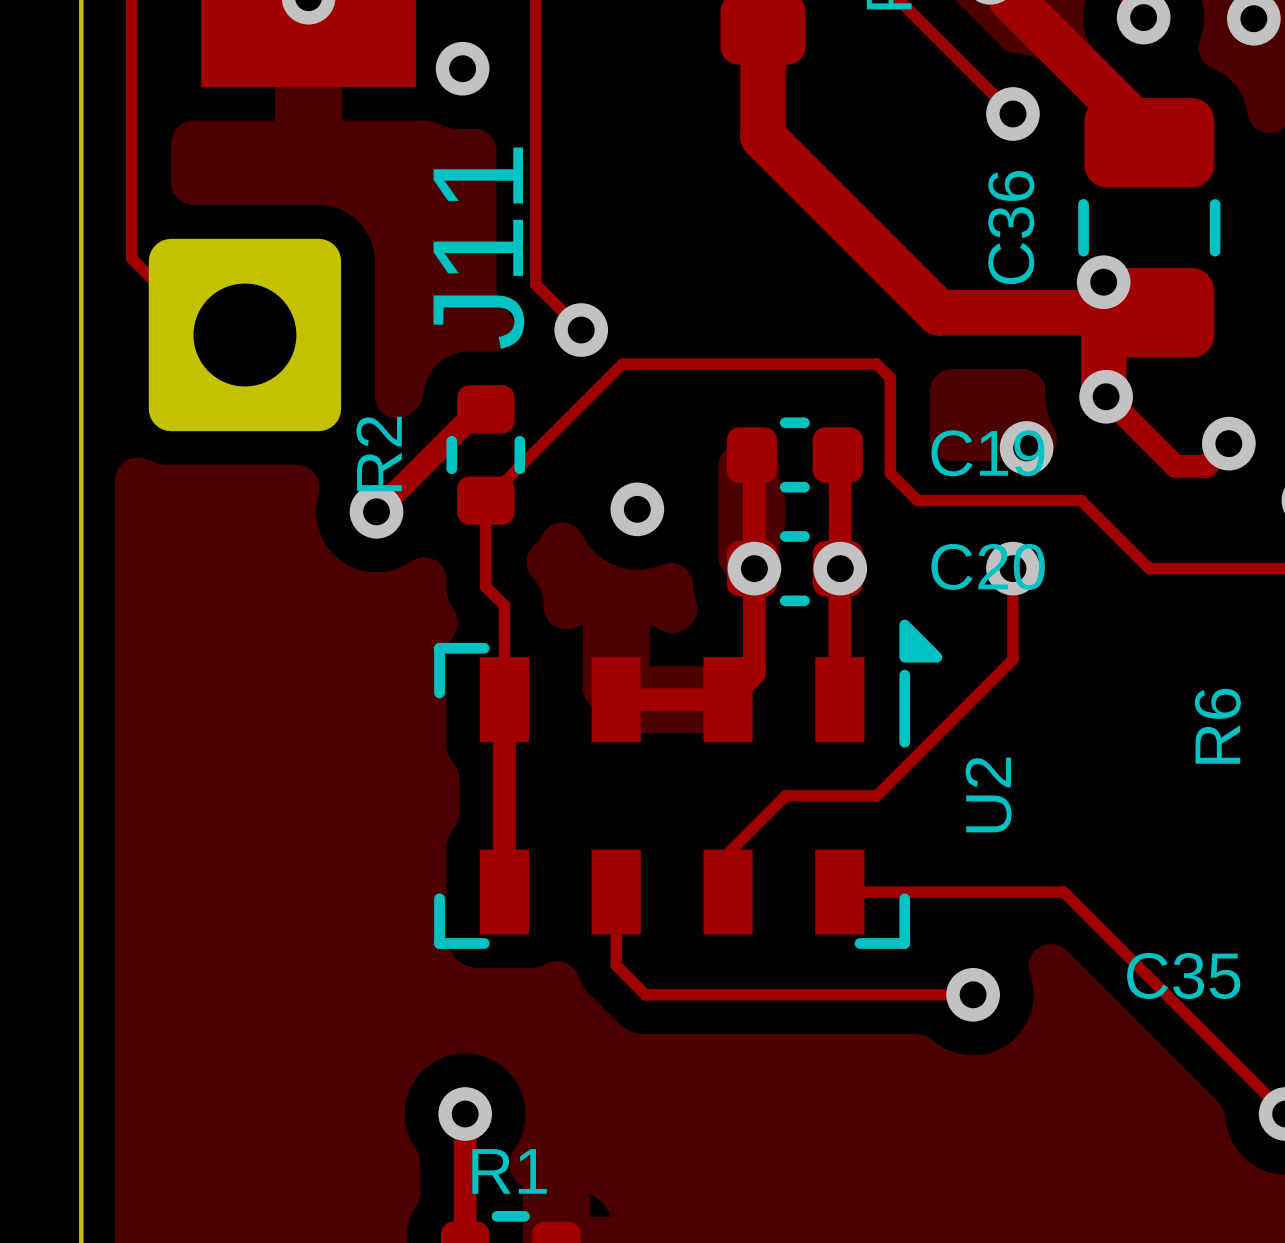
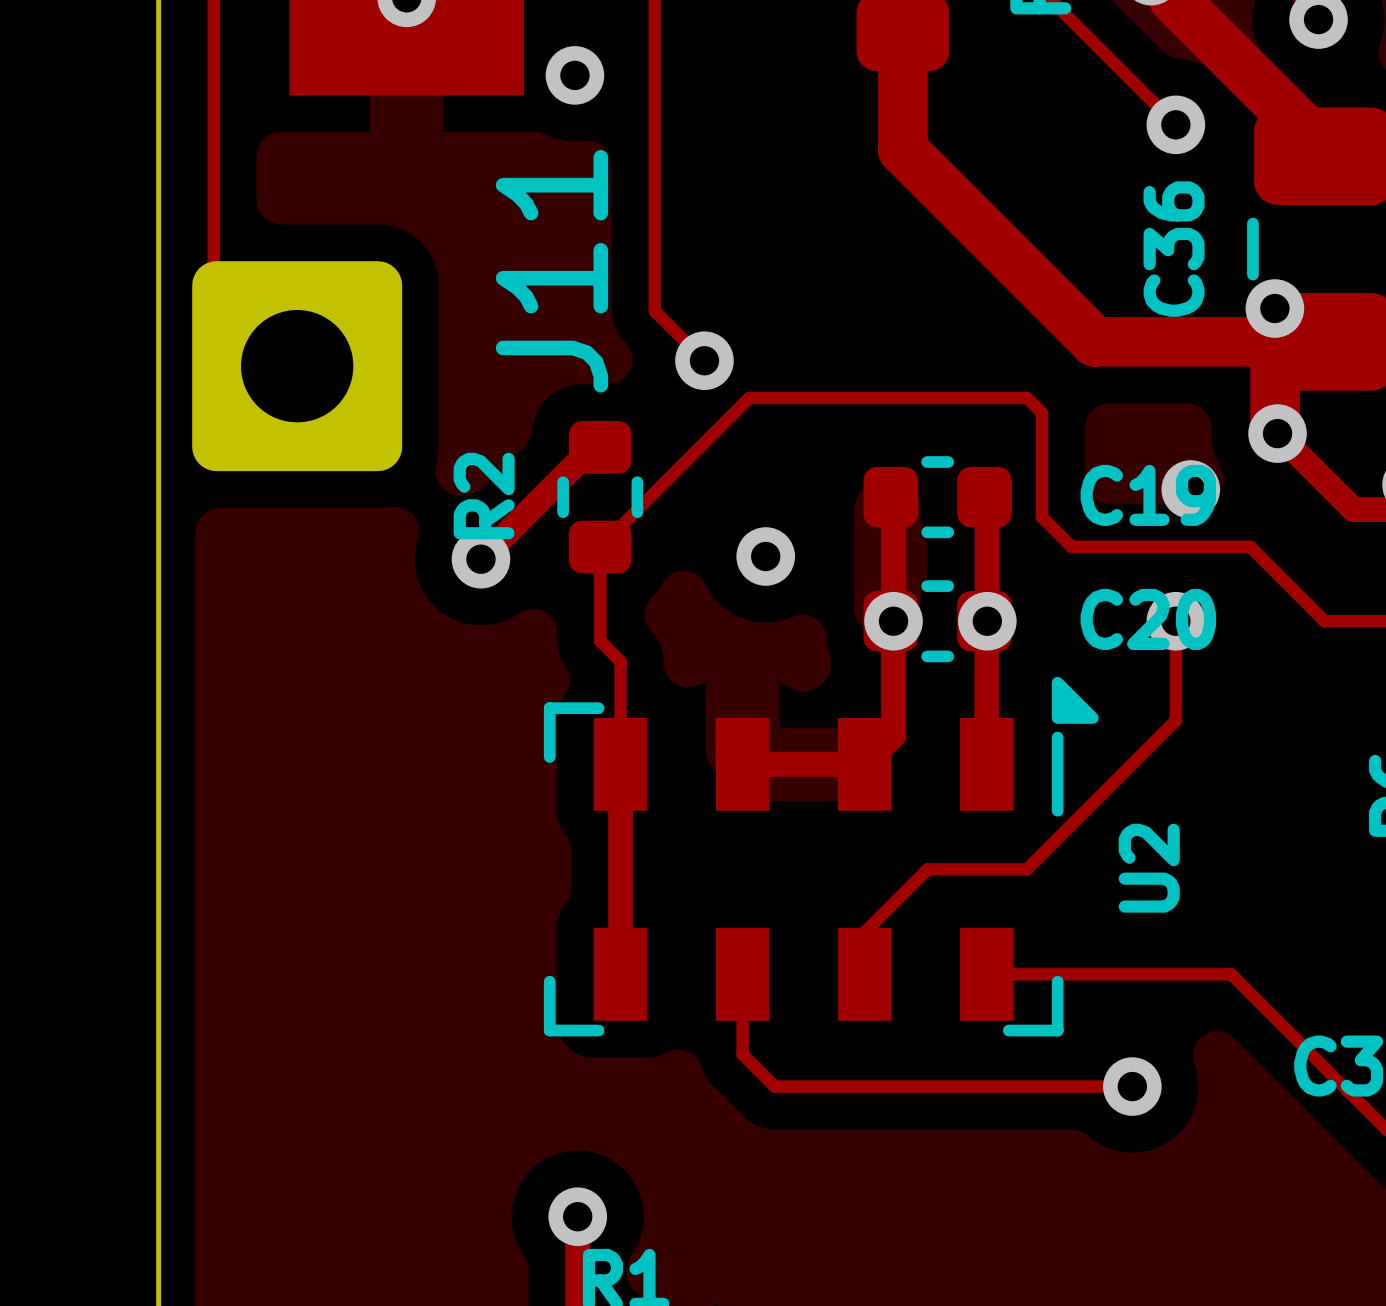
J11 position: (244, 335) -> (297, 366)

